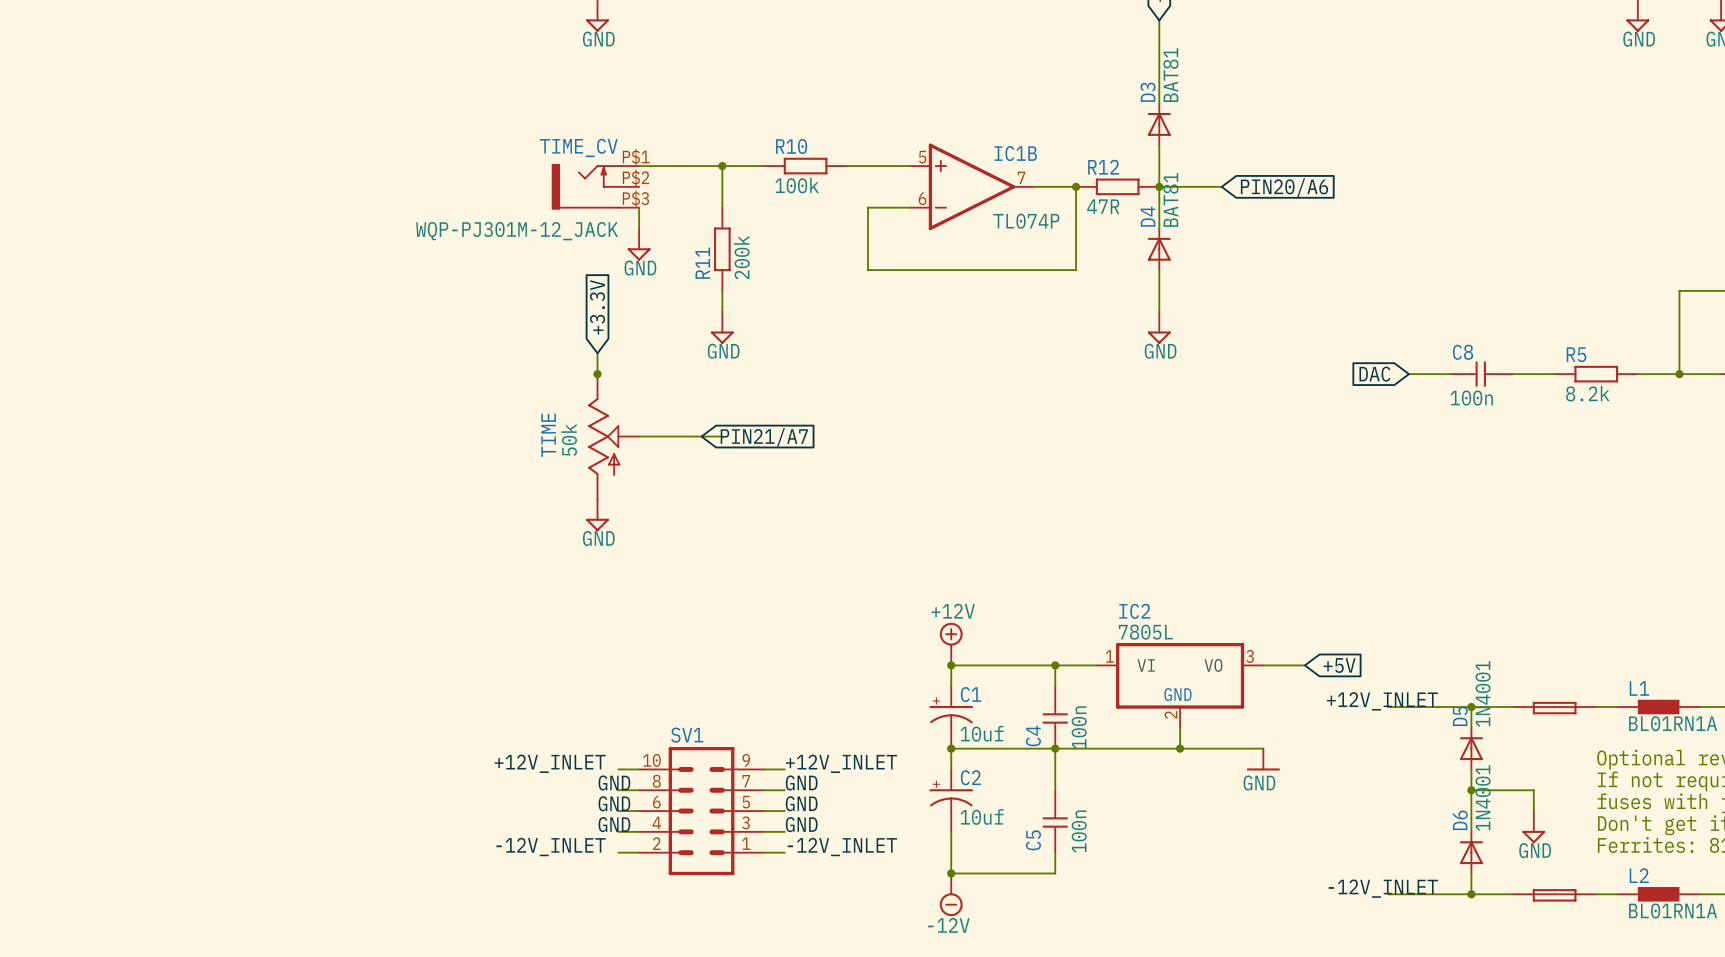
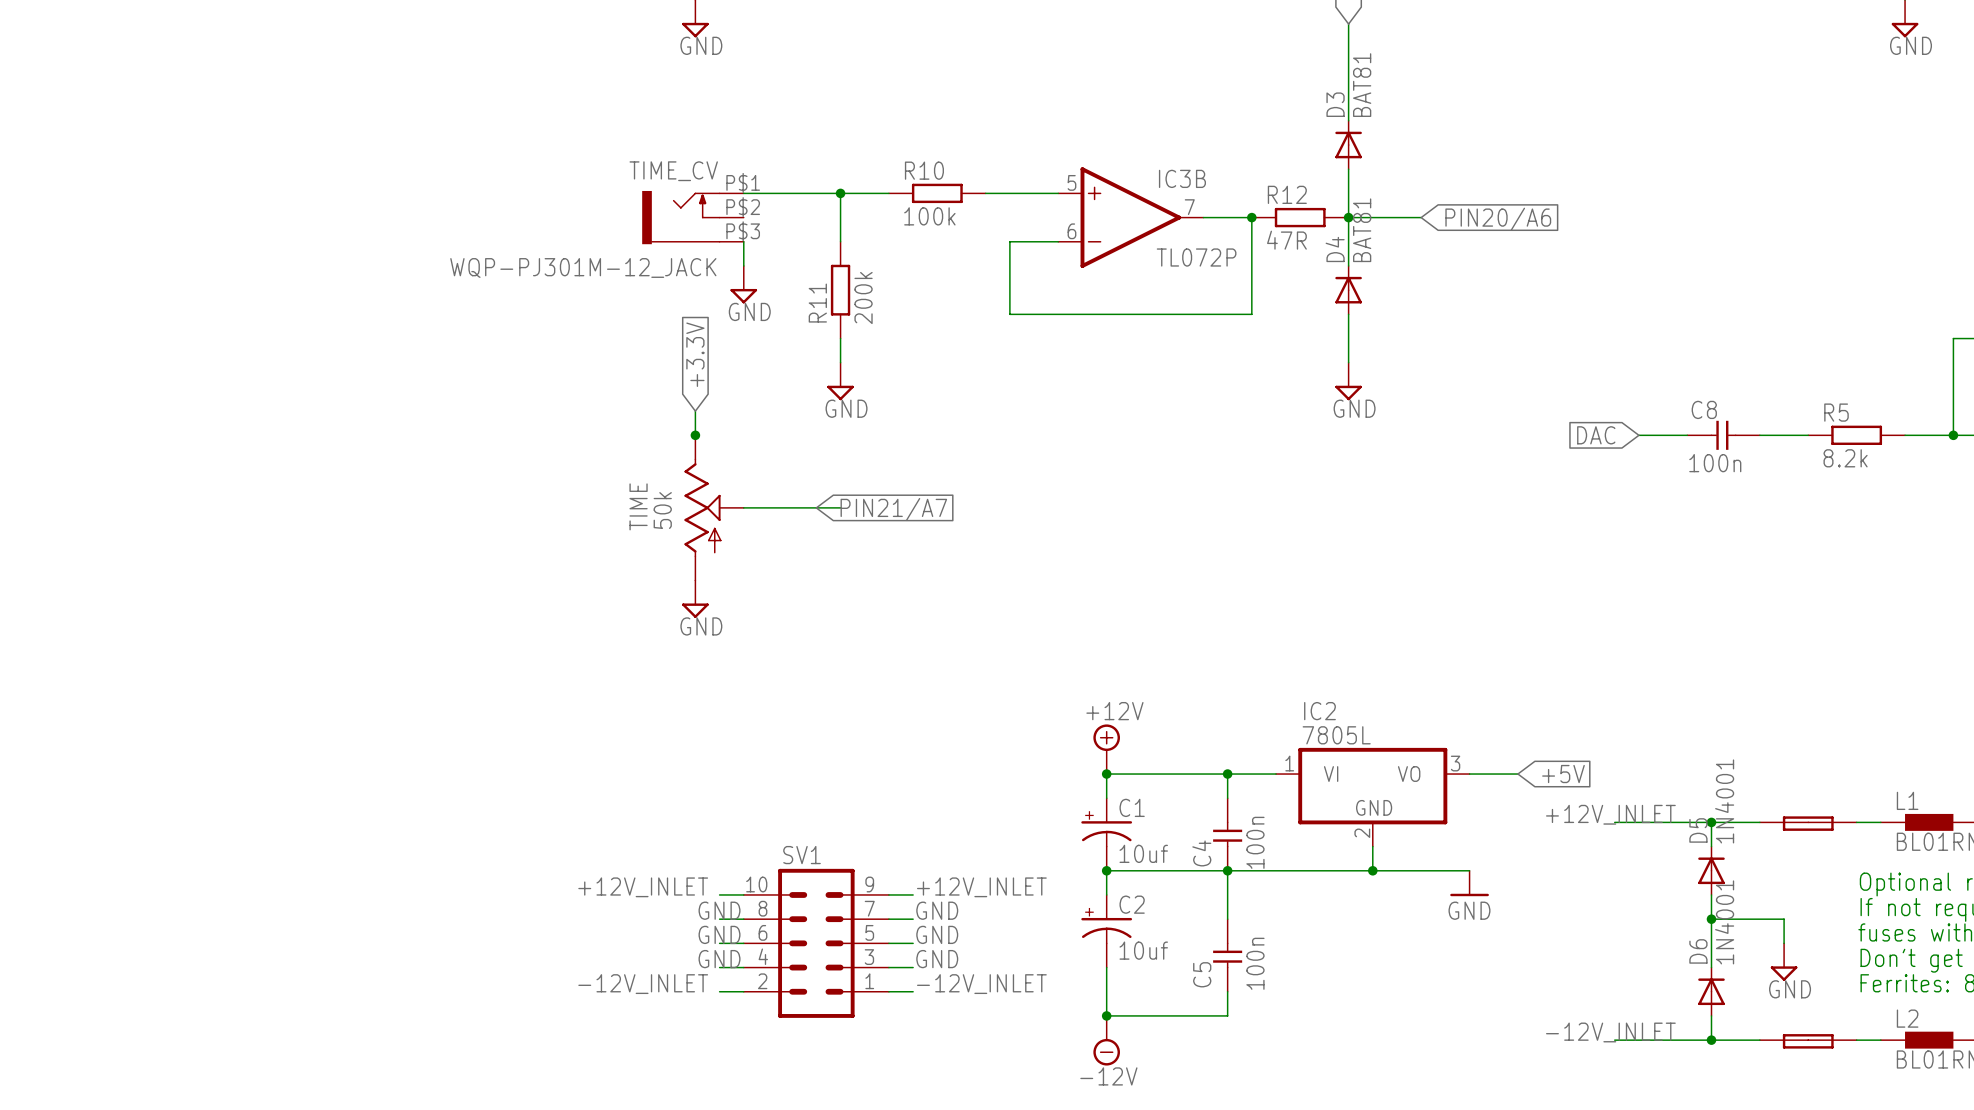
IC1B name: IC1B (1015, 153) -> IC3B (1182, 178)
IC1B value: TL074P (1026, 221) -> TL072P (1196, 257)

